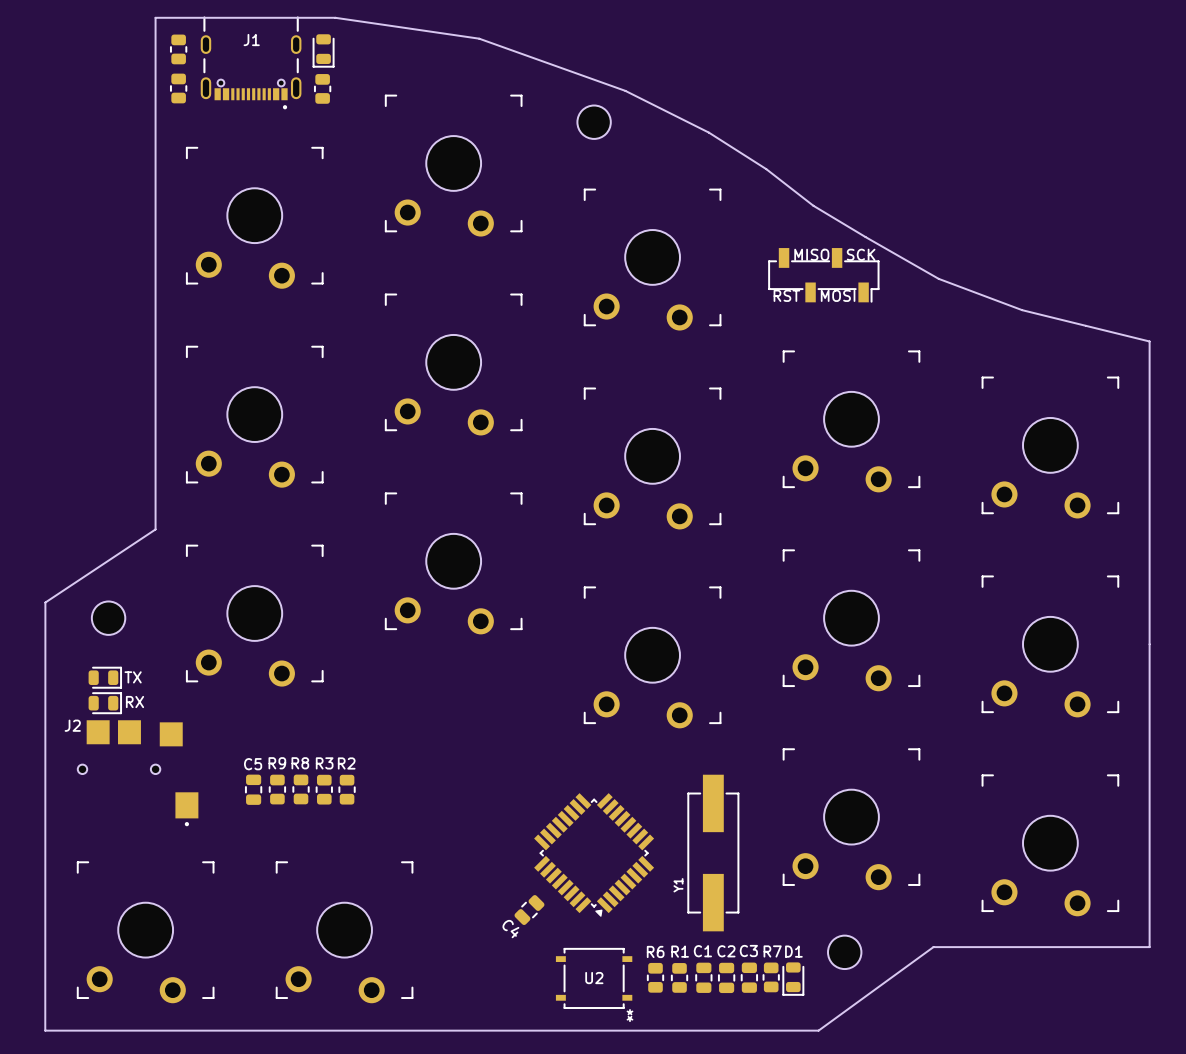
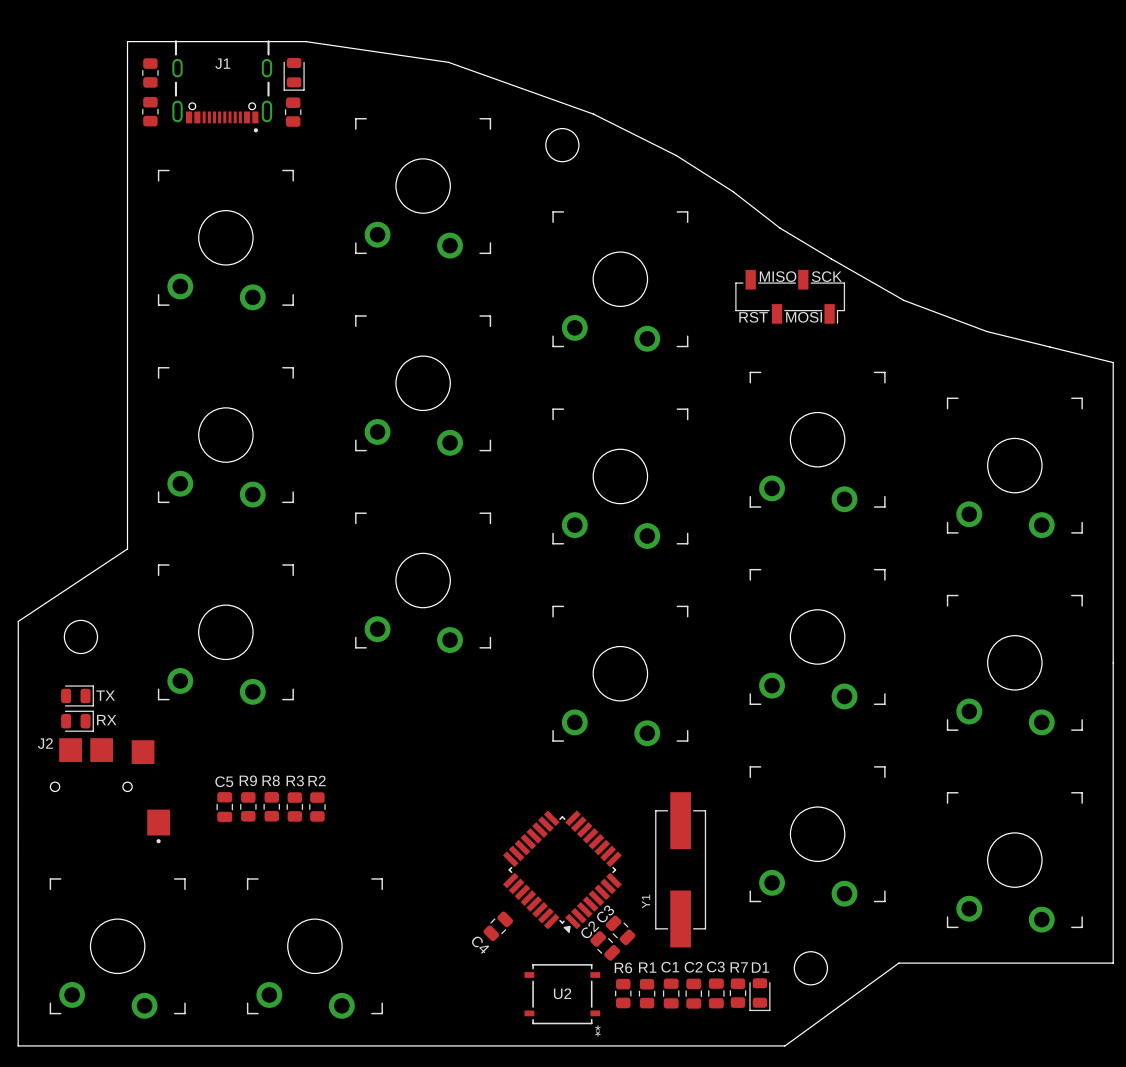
C3: none -> (620, 930)
C2: none -> (605, 945)

